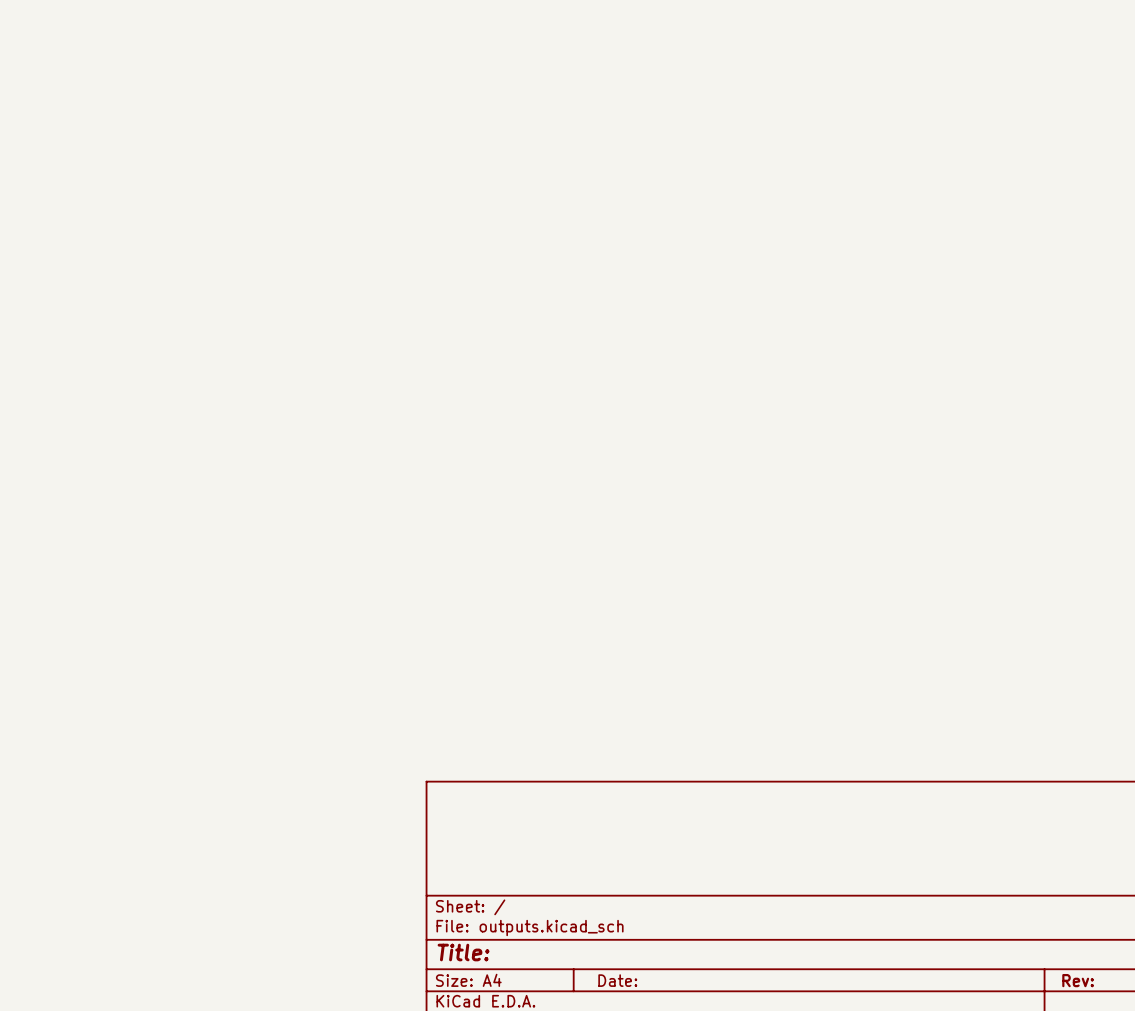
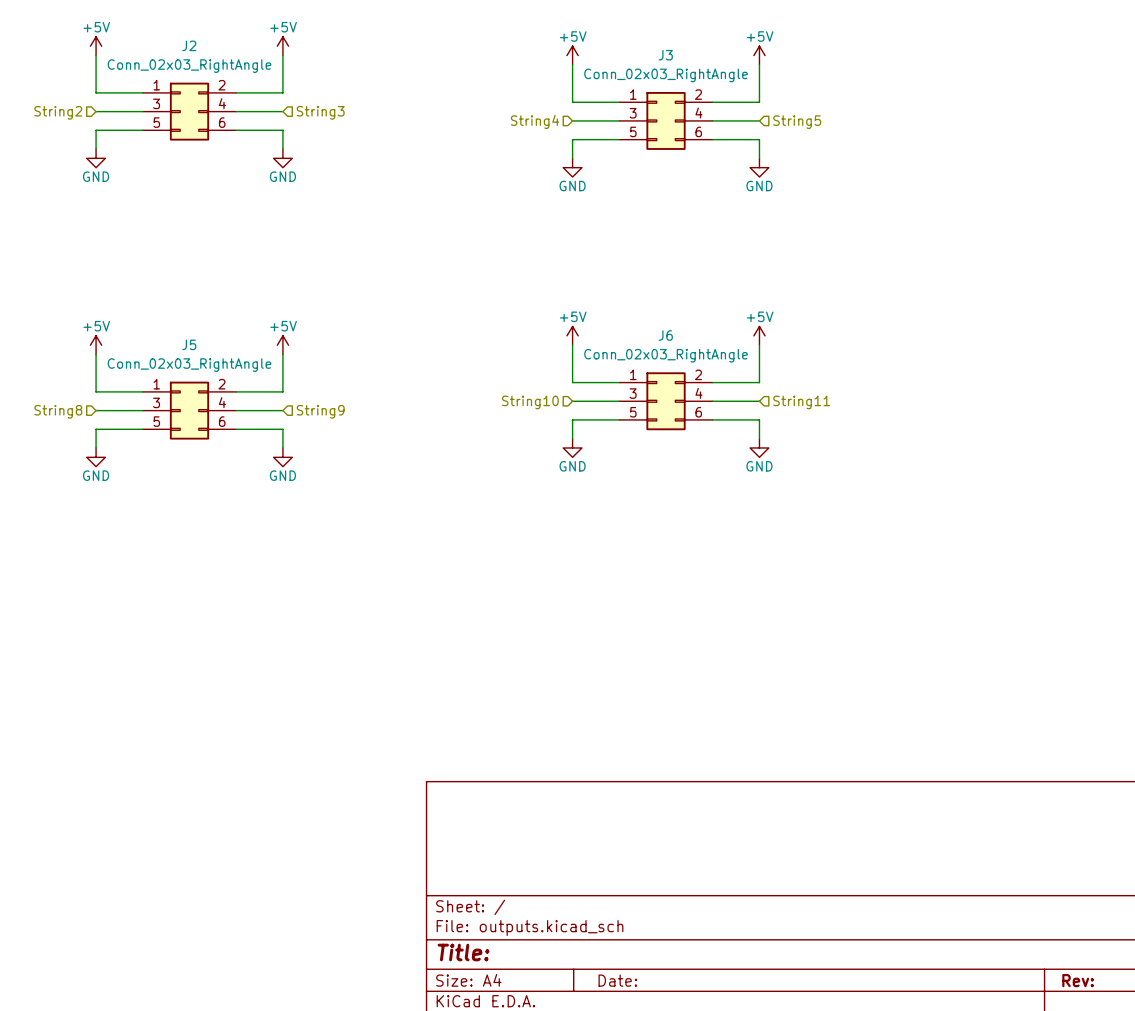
power symbol: none -> +5V (96, 46)
power symbol: none -> +5V (282, 46)
wire: none -> (96, 55) (96, 92) (142, 92)
wire: none -> (282, 55) (282, 92) (236, 92)
power symbol: none -> +5V (572, 55)
power symbol: none -> +5V (759, 55)
wire: none -> (572, 64) (572, 102) (619, 102)
wire: none -> (759, 64) (759, 102) (712, 102)
wire: none -> (96, 111) (142, 111)
J2: none -> Conn_02x03_RightAngle (189, 111)
wire: none -> (236, 111) (282, 111)
hierarchical label: none -> String2 (58, 112)
hierarchical label: none -> String3 (320, 112)
wire: none -> (572, 120) (619, 120)
J3: none -> Conn_02x03_RightAngle (666, 120)
wire: none -> (712, 120) (759, 120)
hierarchical label: none -> String4 (535, 121)
hierarchical label: none -> String5 (797, 122)
wire: none -> (142, 130) (96, 130) (96, 148)
wire: none -> (236, 130) (282, 130) (282, 148)
wire: none -> (619, 139) (572, 139) (572, 158)
wire: none -> (712, 139) (759, 139) (759, 158)
power symbol: none -> GND (96, 158)
power symbol: none -> GND (282, 158)
power symbol: none -> GND (572, 167)
power symbol: none -> GND (759, 167)
power symbol: none -> +5V (572, 335)
power symbol: none -> +5V (759, 335)
power symbol: none -> +5V (96, 345)
power symbol: none -> +5V (282, 345)
wire: none -> (572, 345) (572, 382) (619, 382)
wire: none -> (759, 345) (759, 382) (712, 382)
wire: none -> (96, 354) (96, 391) (142, 391)
wire: none -> (282, 354) (282, 391) (236, 391)
wire: none -> (572, 401) (619, 401)
J6: none -> Conn_02x03_RightAngle (666, 401)
wire: none -> (712, 401) (759, 401)
hierarchical label: none -> String10 (530, 402)
hierarchical label: none -> String11 (801, 402)
wire: none -> (96, 410) (142, 410)
J5: none -> Conn_02x03_RightAngle (189, 410)
wire: none -> (236, 410) (282, 410)
hierarchical label: none -> String8 (58, 411)
hierarchical label: none -> String9 (320, 411)
wire: none -> (619, 419) (572, 419) (572, 438)
wire: none -> (712, 419) (759, 419) (759, 438)
wire: none -> (142, 429) (96, 429) (96, 447)
wire: none -> (236, 429) (282, 429) (282, 447)
power symbol: none -> GND (572, 447)
power symbol: none -> GND (759, 447)
power symbol: none -> GND (96, 457)
power symbol: none -> GND (282, 457)

